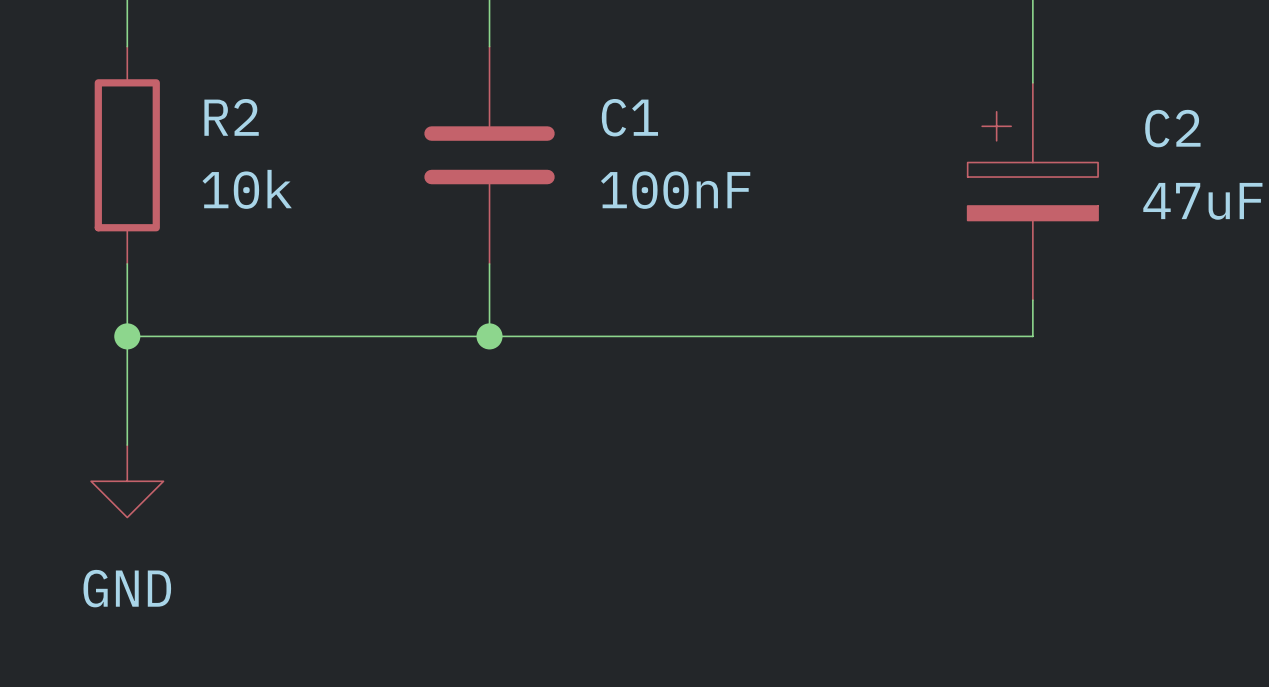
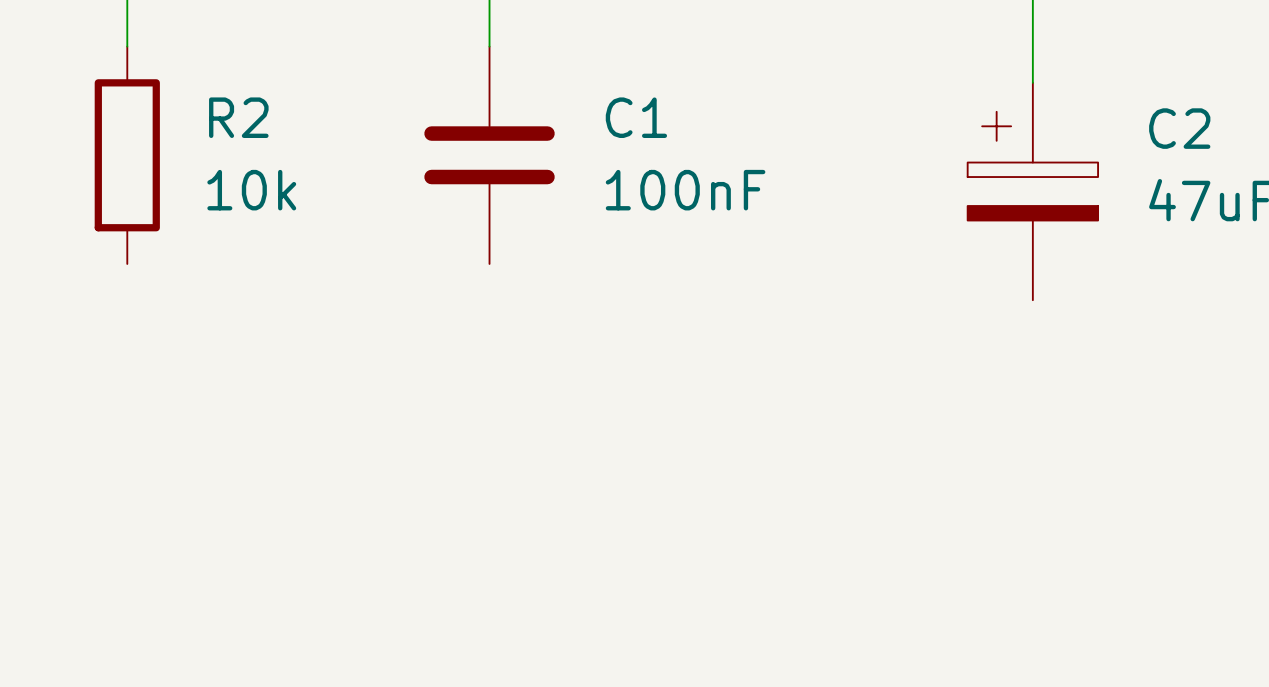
wire: (127, 263) (127, 445) -> none
wire: (489, 263) (489, 336) -> none
wire: (1032, 300) (1032, 336) (127, 336) -> none
junction: (127, 336) -> none
junction: (489, 336) -> none
power symbol: GND (127, 481) -> none

